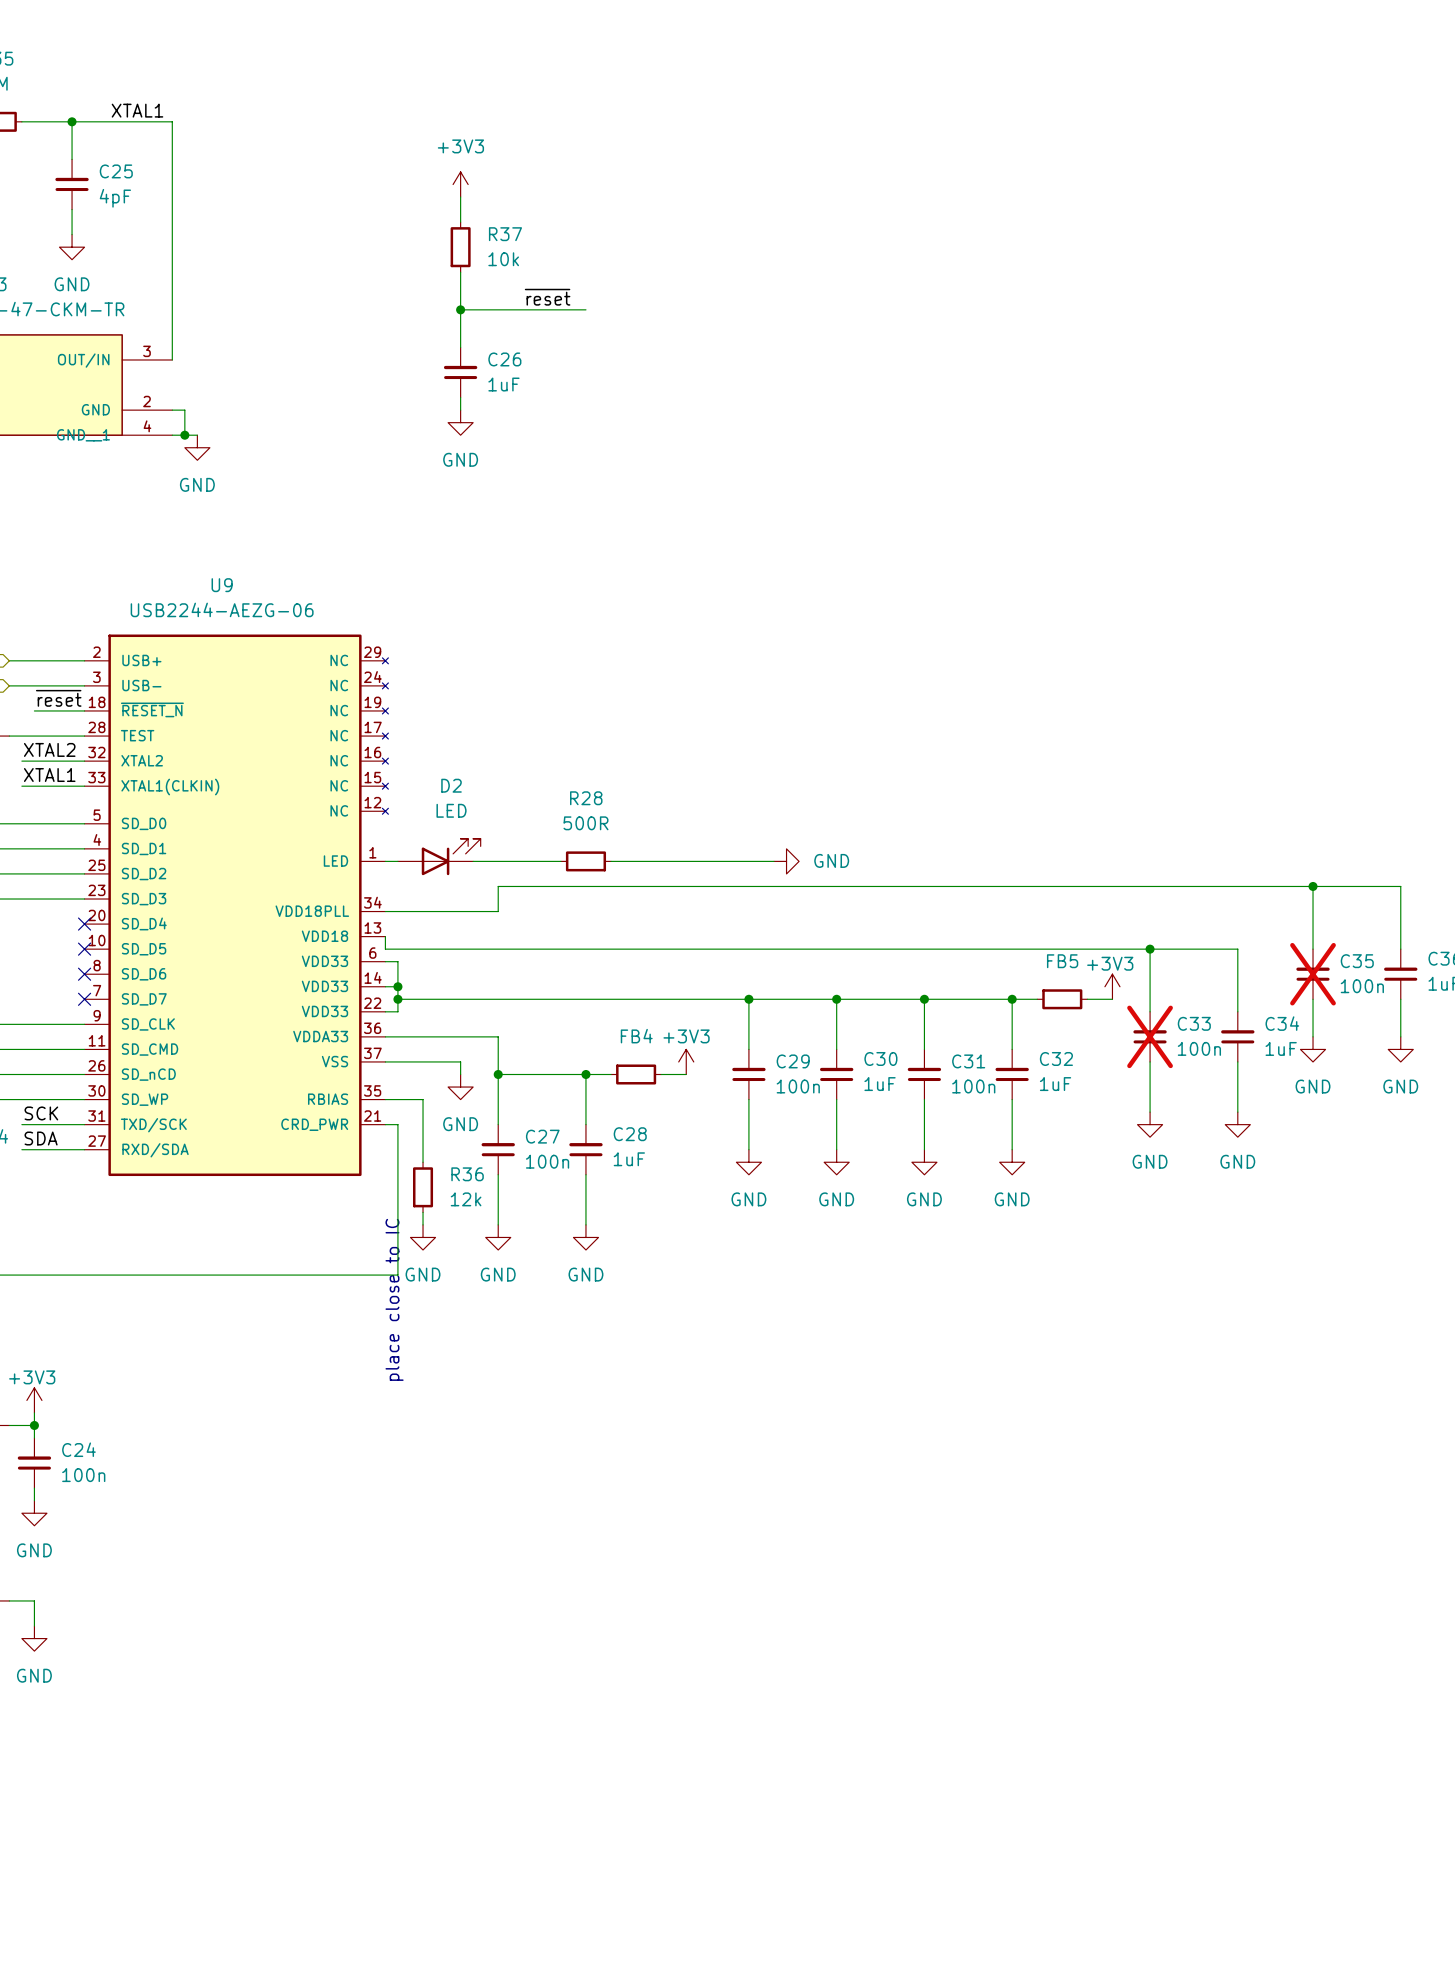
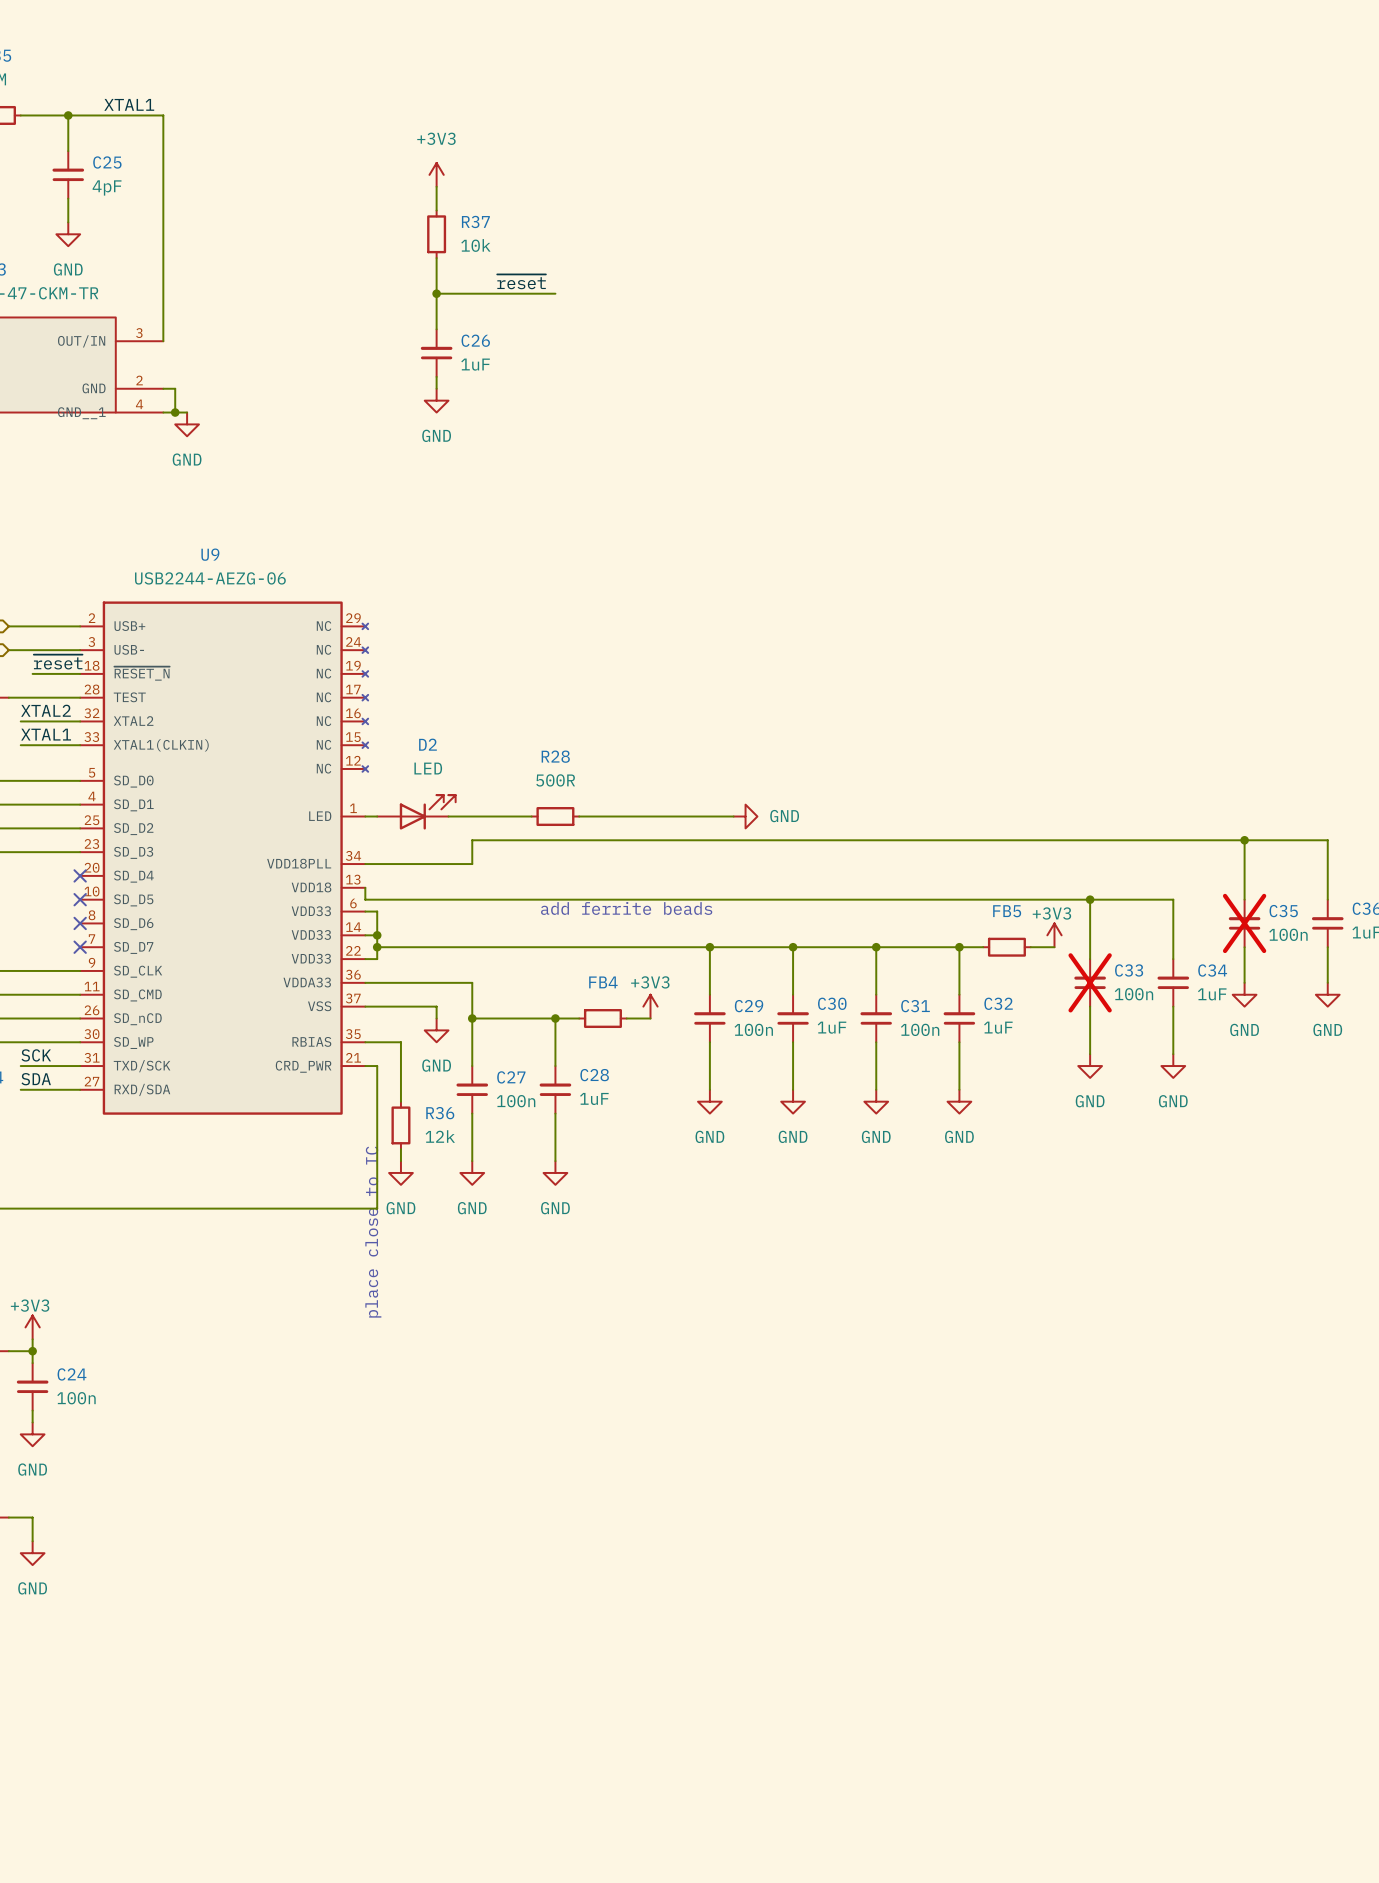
text: none -> add ferrite beads (626, 908)

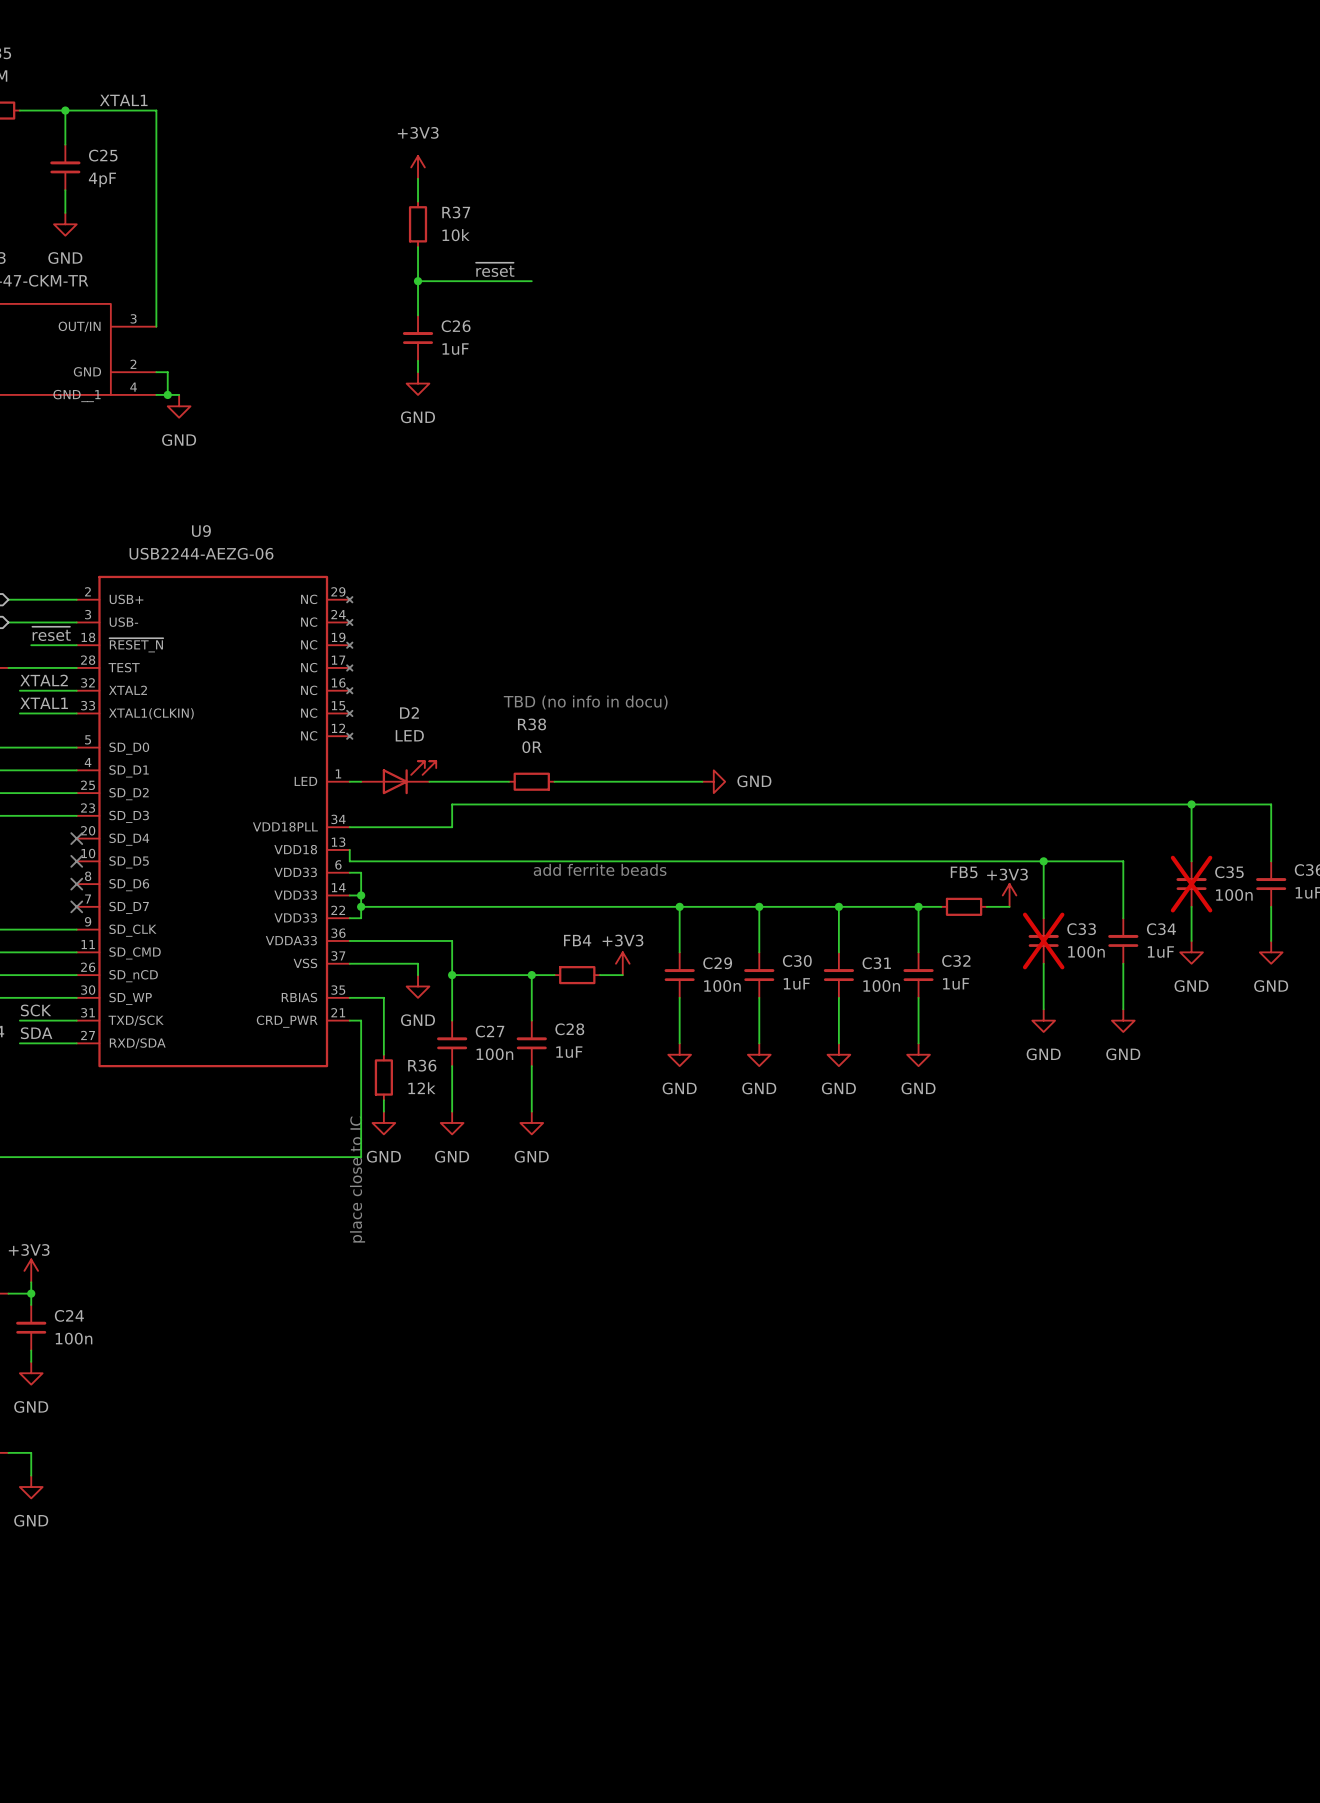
text: none -> TBD (no info in docu) (585, 702)
R28 name: R28 (555, 756) -> R38 (532, 724)
R28 text: 500R (555, 780) -> 0R (532, 747)

